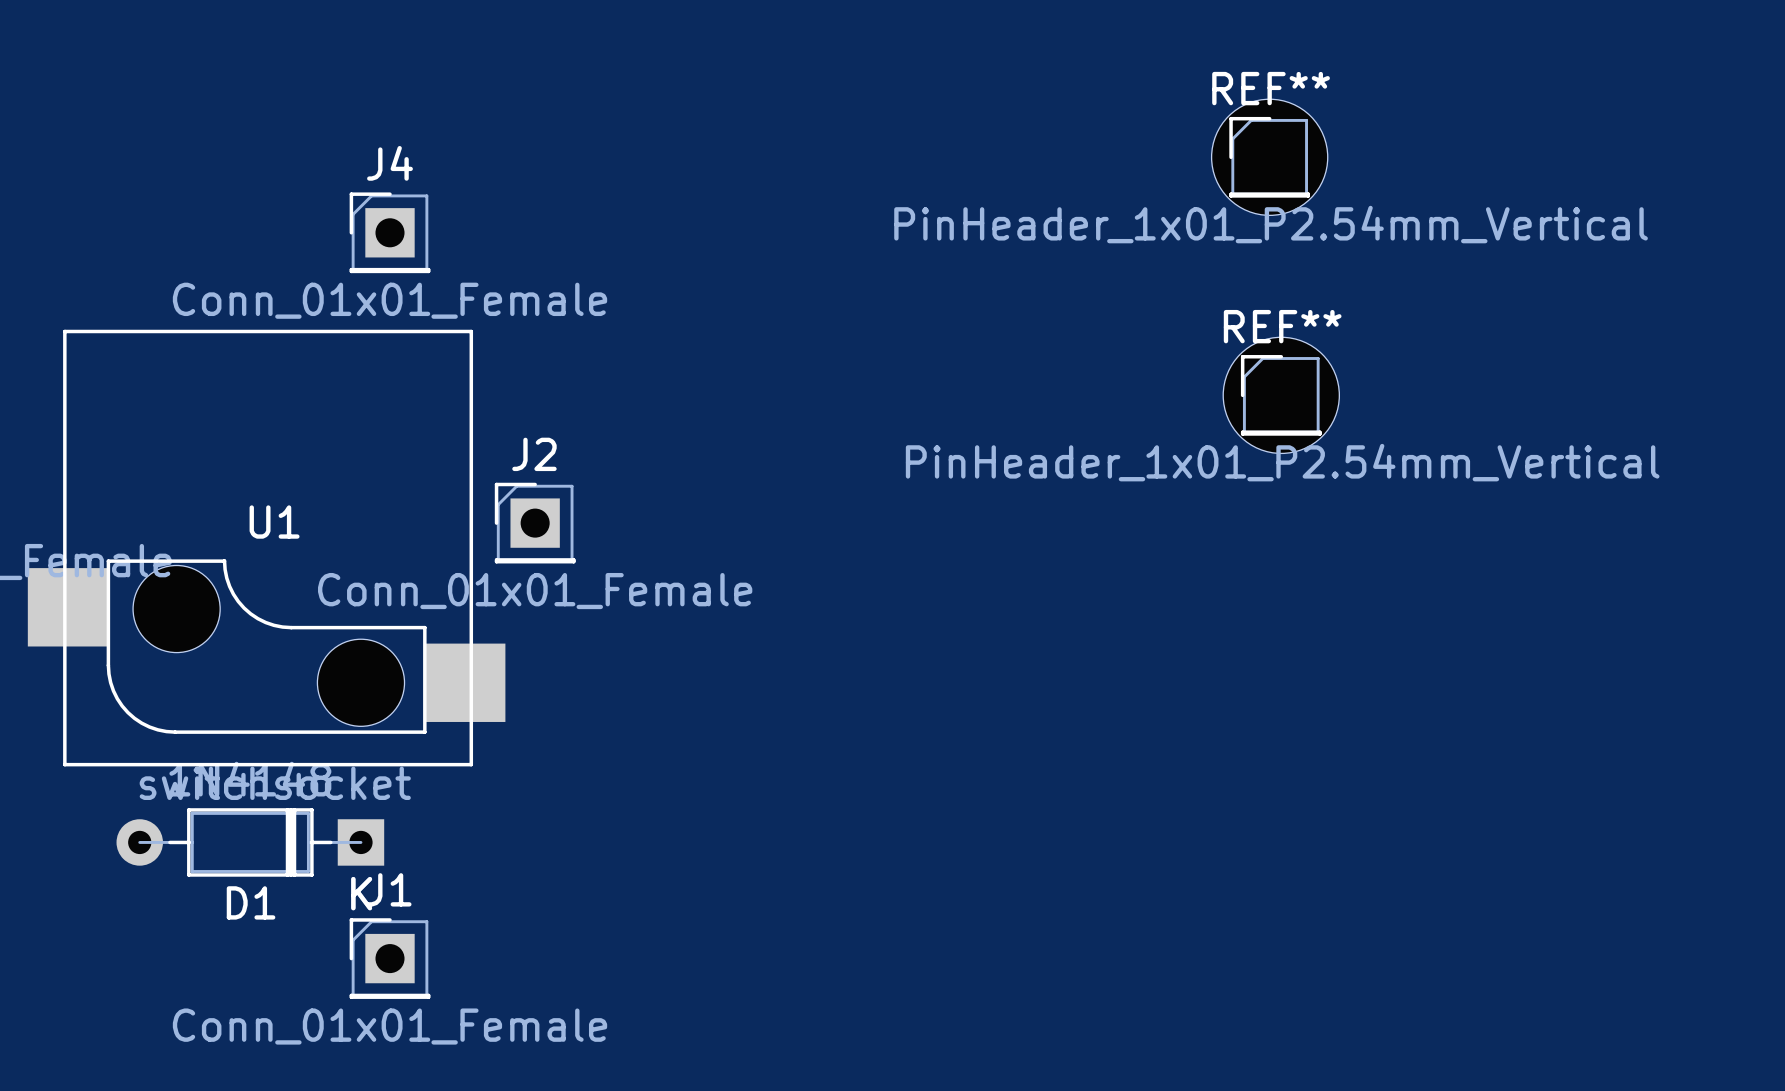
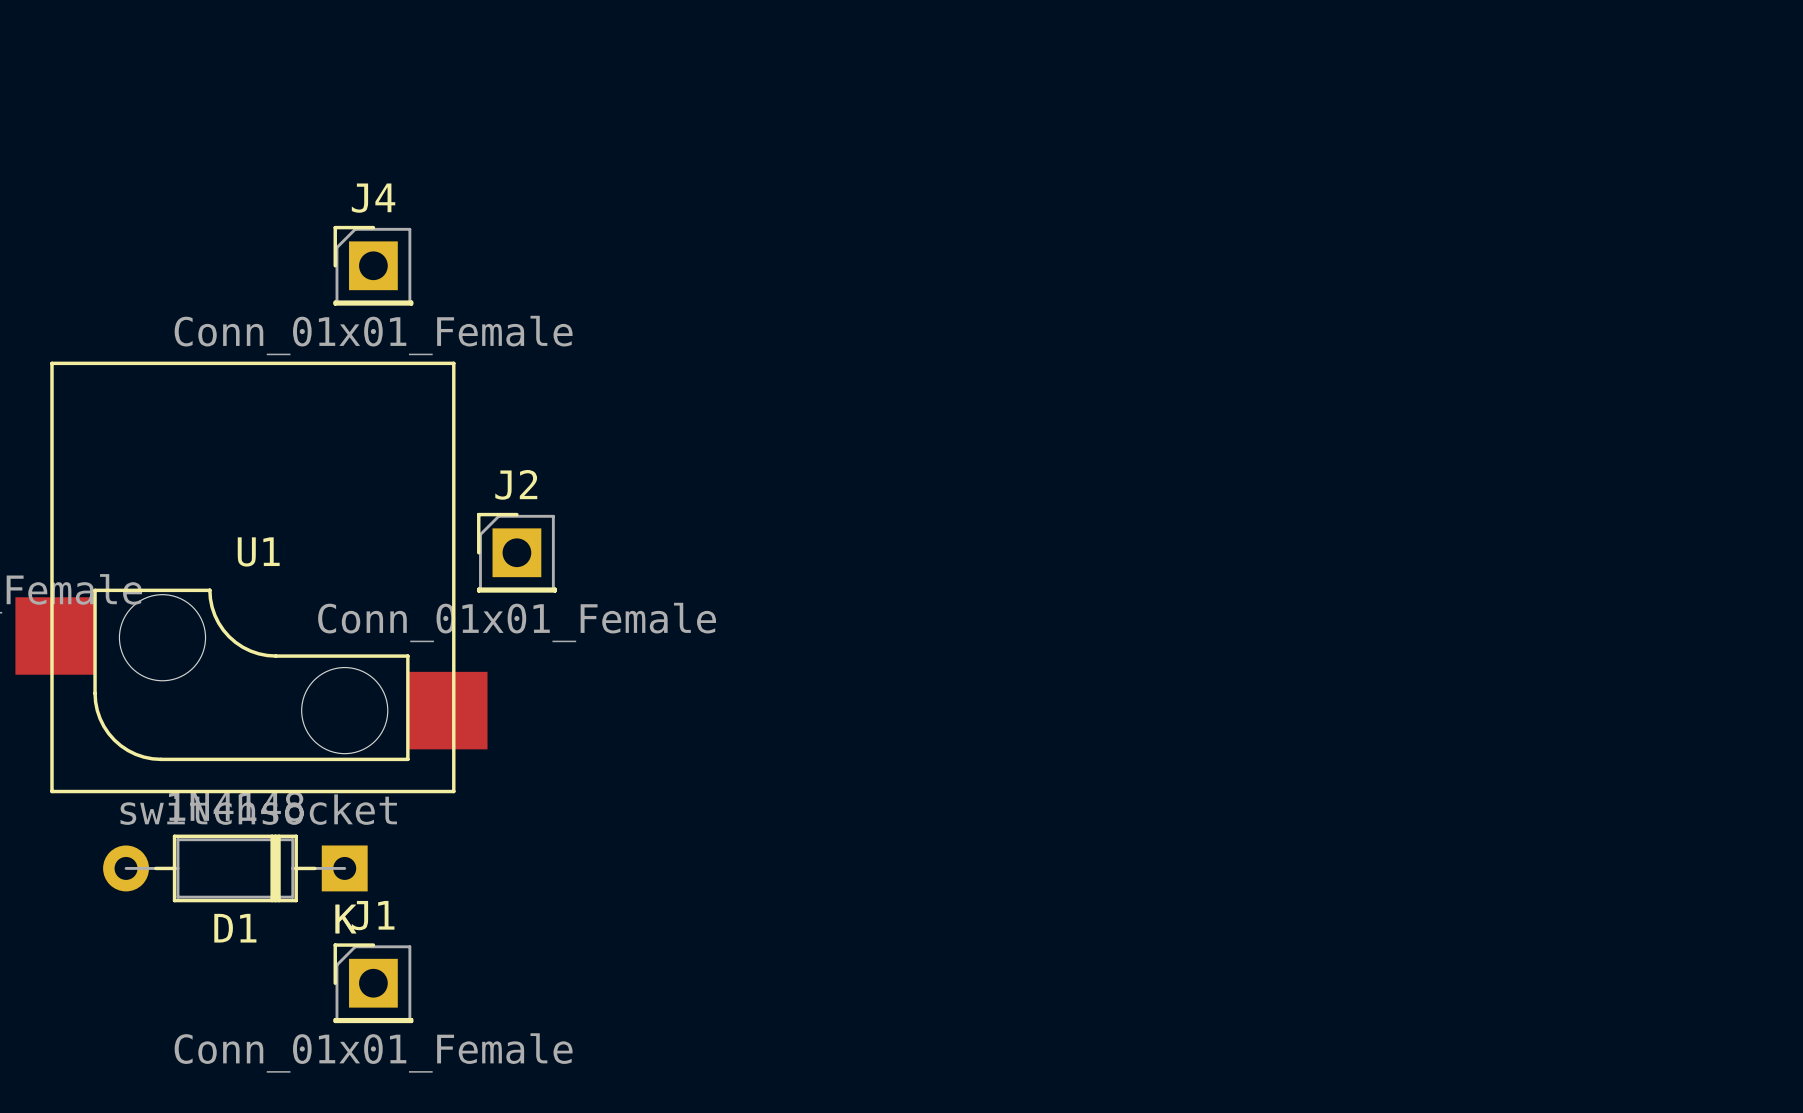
REF**: PinHeader_1x01_P2.54mm_Vertical (1269, 157) -> none
REF**: PinHeader_1x01_P2.54mm_Vertical (1281, 395) -> none

